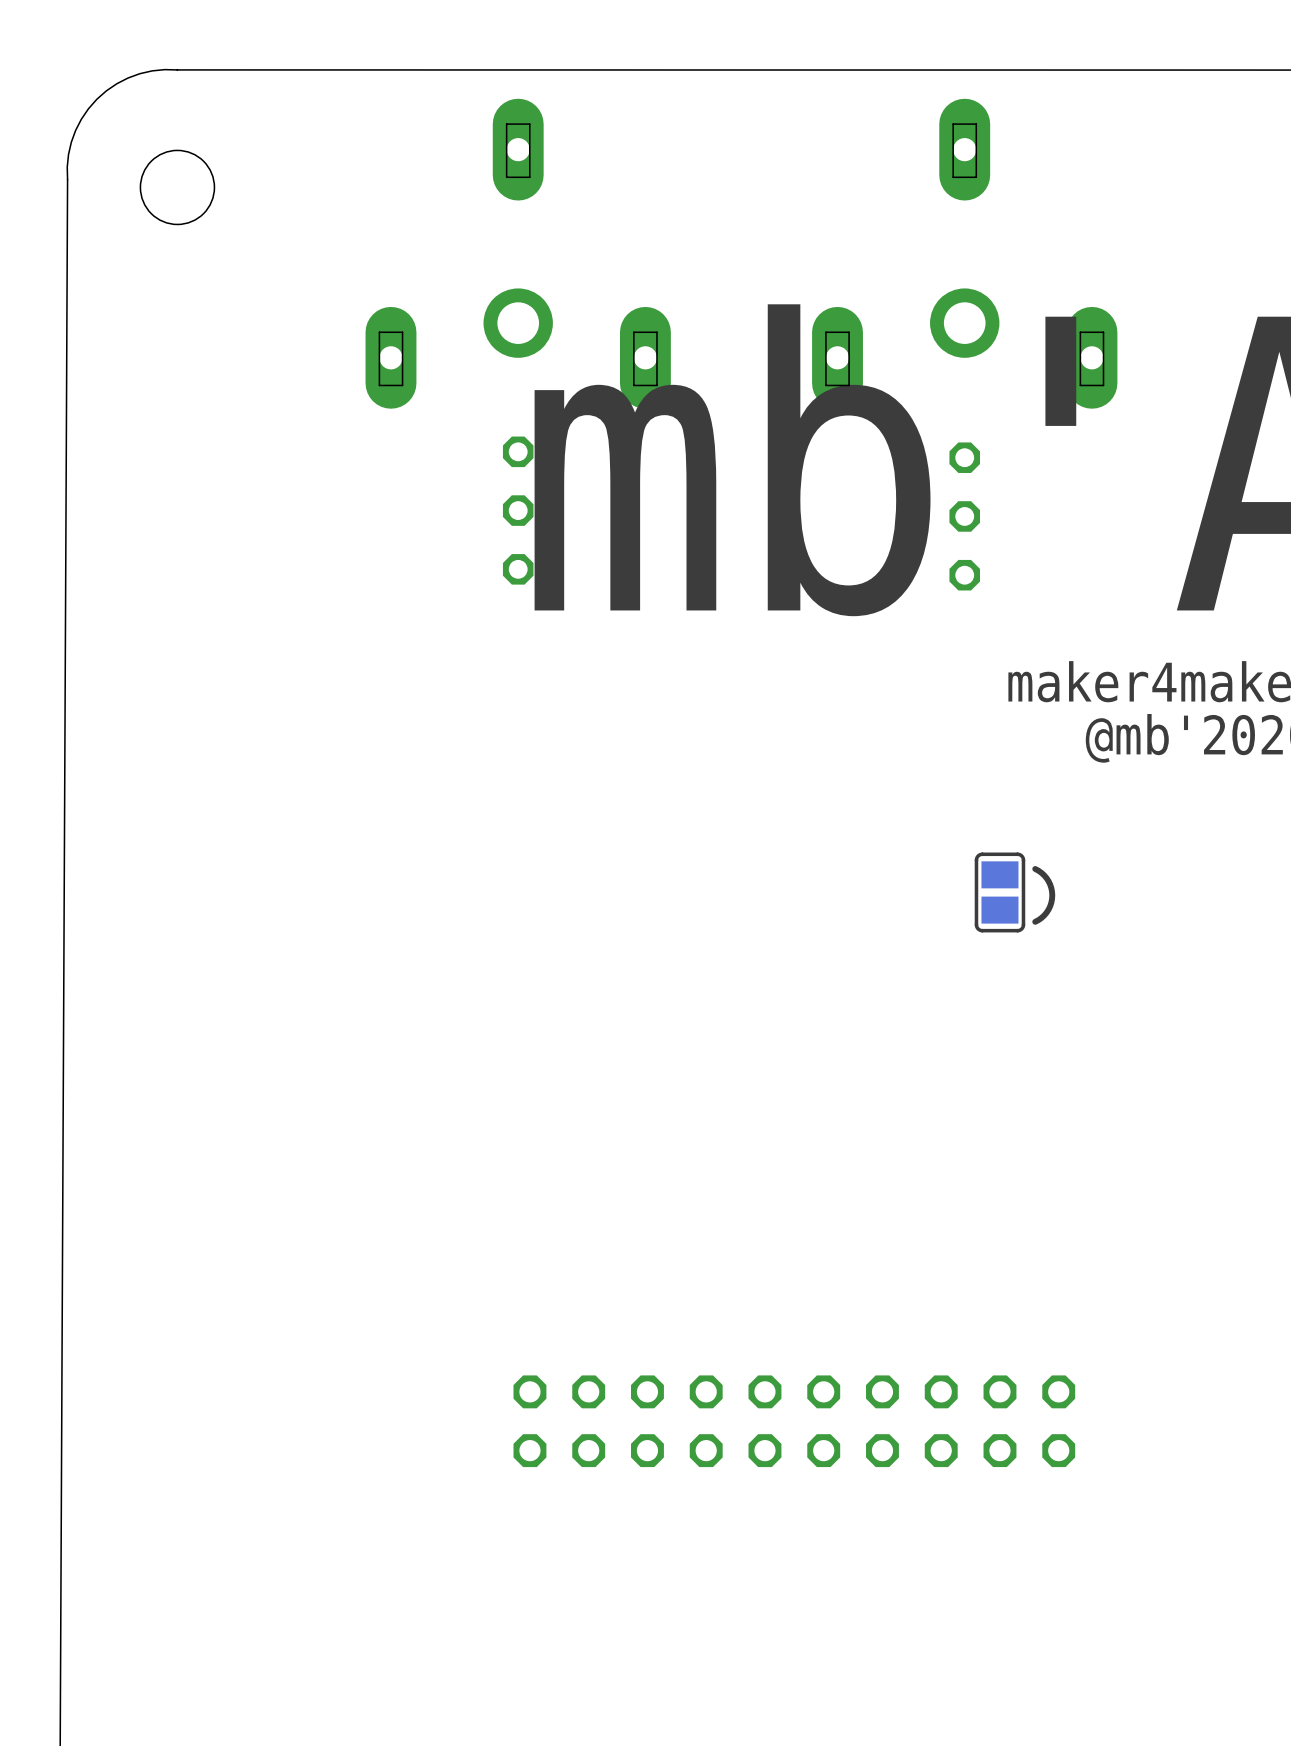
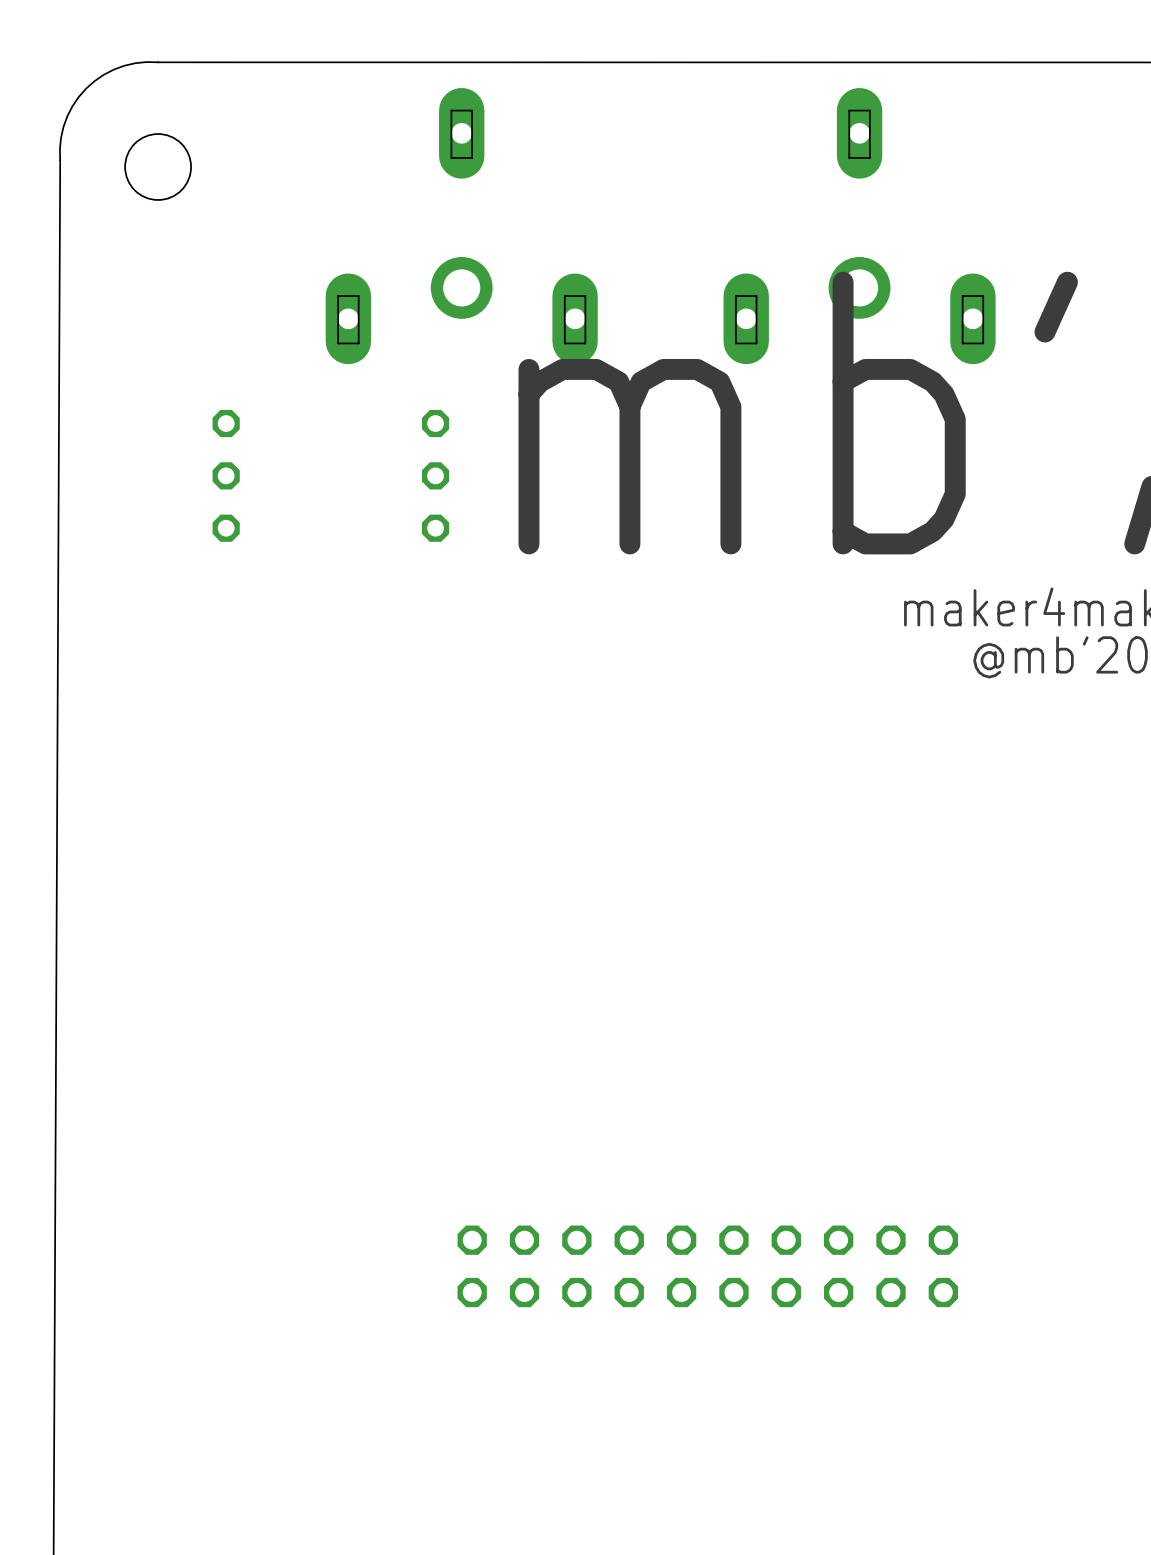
part position: (518, 510) -> (435, 475)
part: (964, 516) -> none
part: none -> (226, 475)
line: (1035, 868) (1046, 878) (1052, 895) (1046, 912) (1035, 921) -> none
part: (999, 892) -> none

